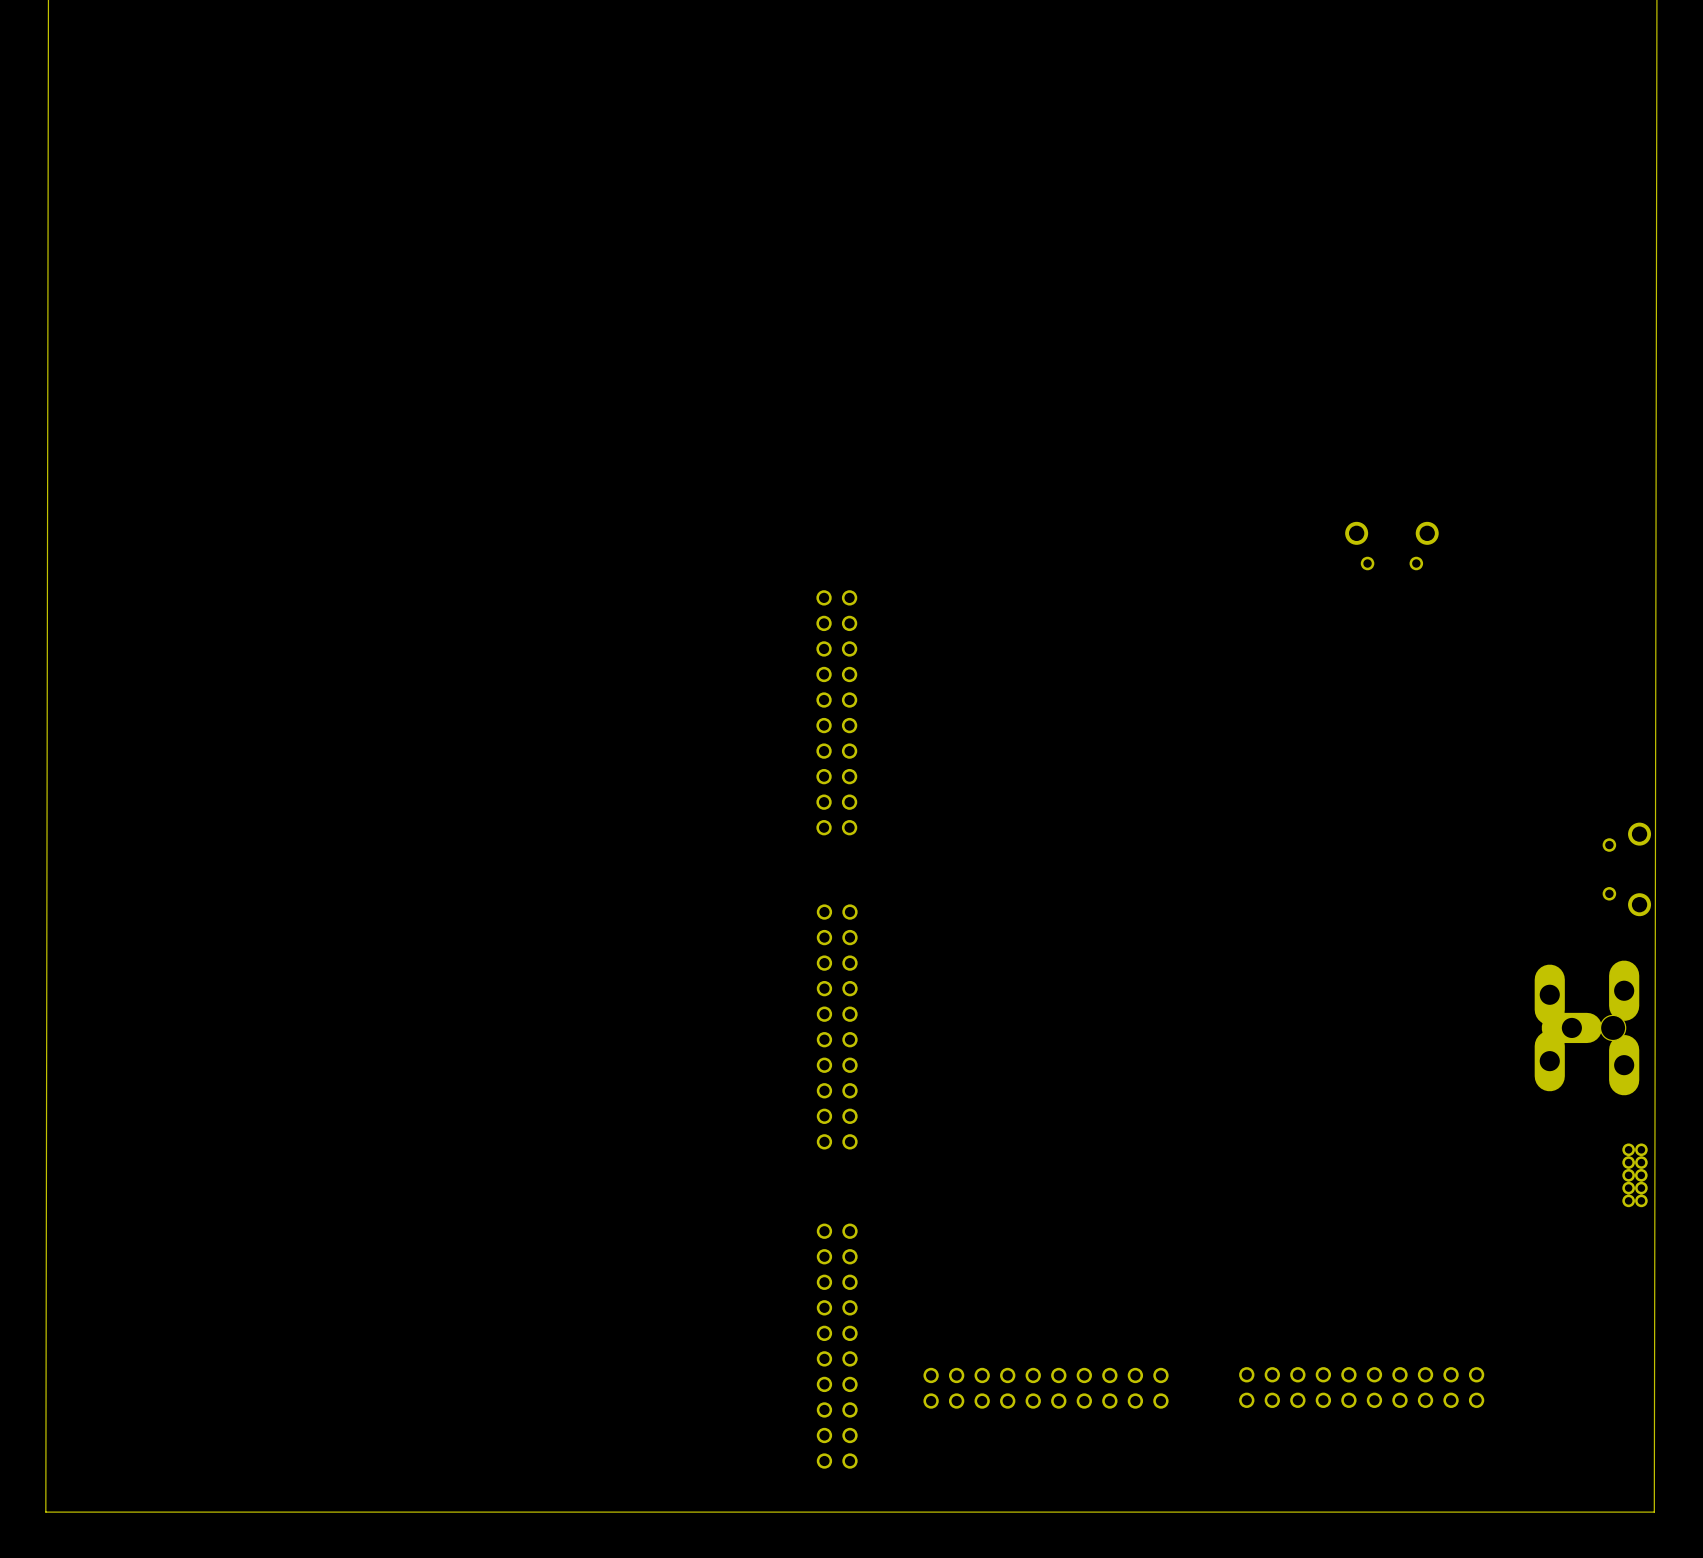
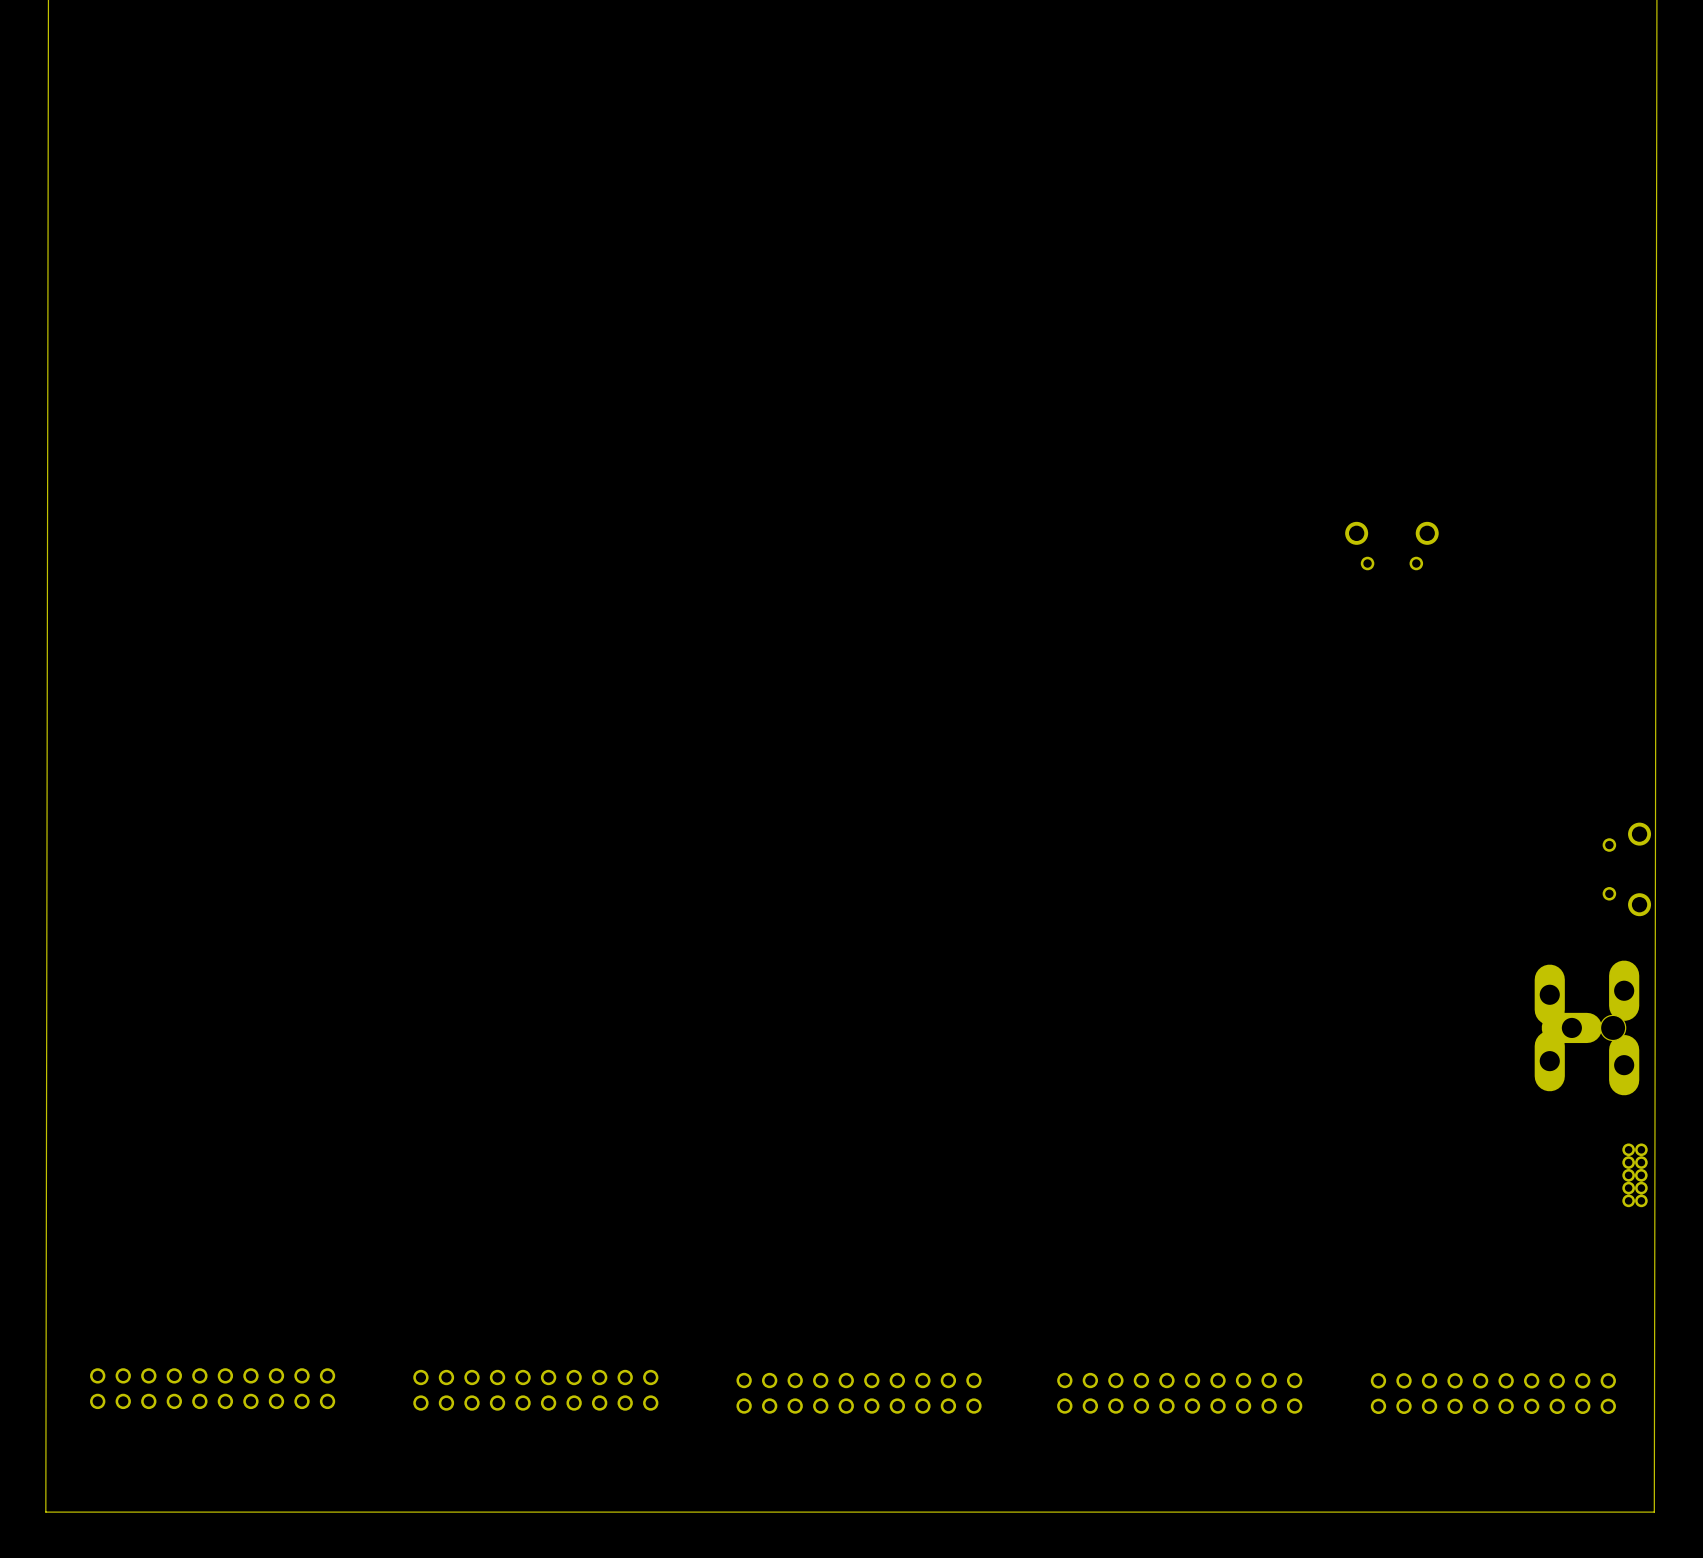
part: (836, 712) -> none
part: (837, 1026) -> none
part rotation: 0° (837, 1346) -> 90° clockwise (859, 1393)
part: (1361, 1387) -> none
part: none -> (212, 1388)
part: (1046, 1388) -> none
part: none -> (535, 1390)
part: none -> (1179, 1393)
part: none -> (1493, 1393)

